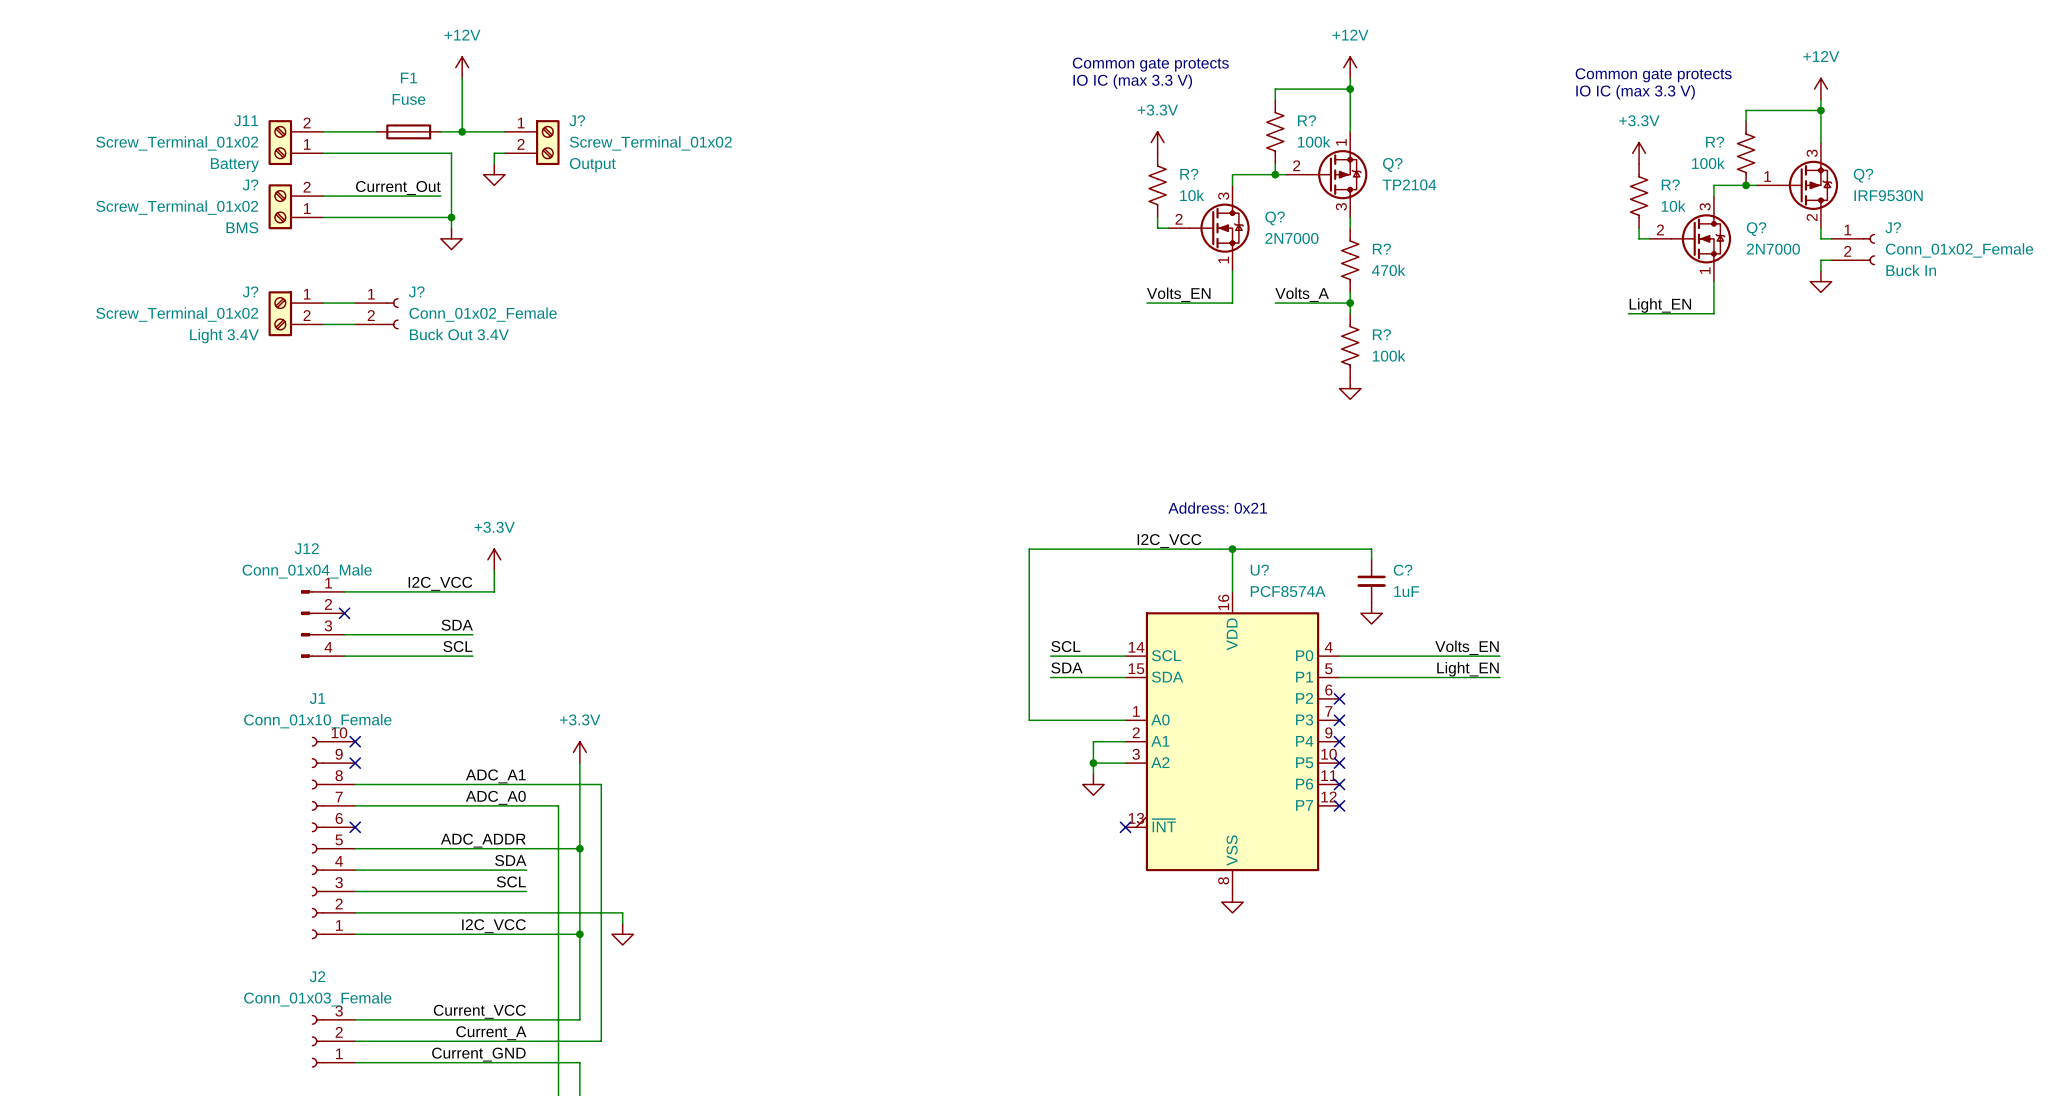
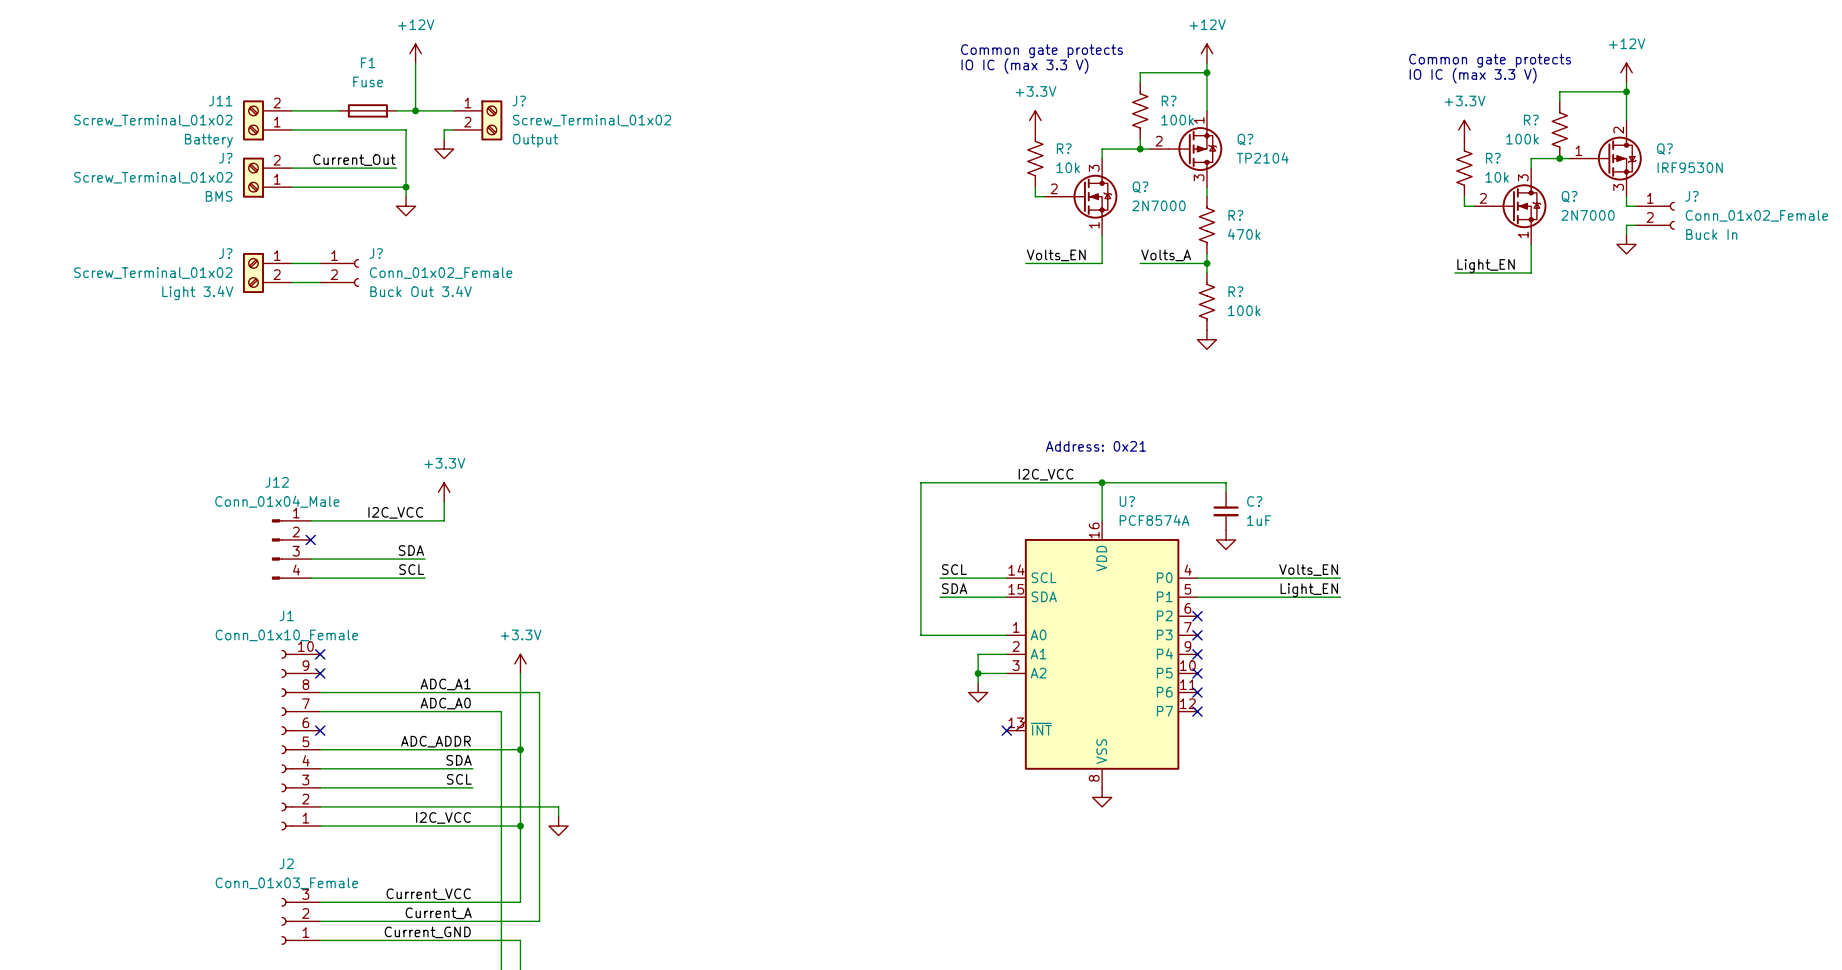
Q? flip: as is (1808, 185) -> up-down (1615, 158)

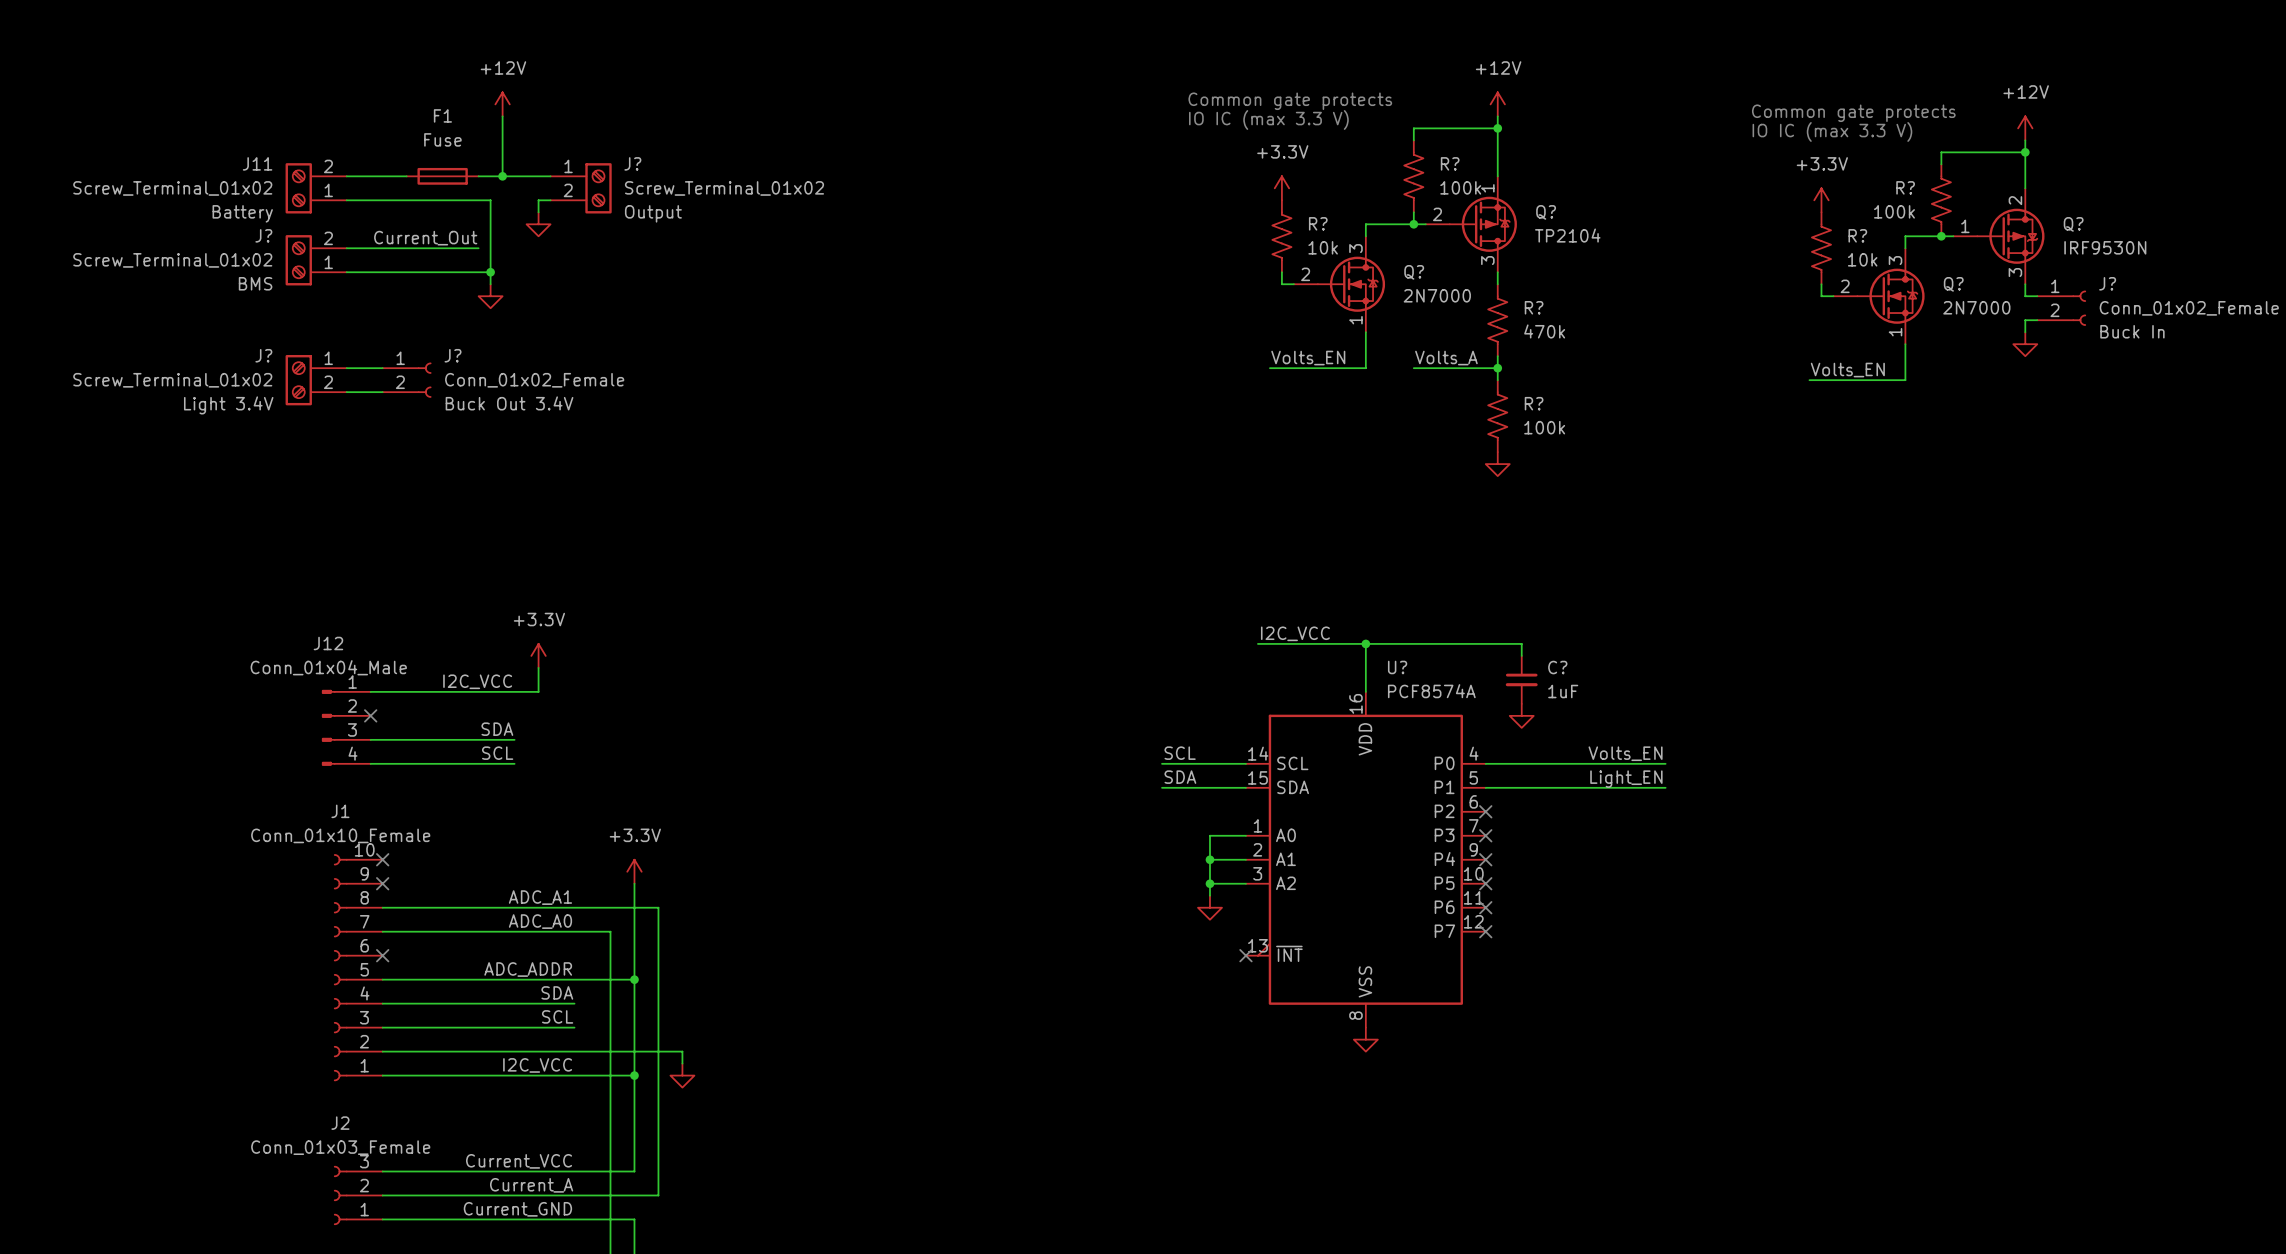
label: Light_EN (1486, 266) -> Volts_EN (1847, 370)
text: Address: 0x21 (1096, 446) -> none
wire: (1016, 482) (920, 482) (920, 635) (978, 635) -> (1209, 859) (1209, 835)
junction: none -> (1209, 859)

